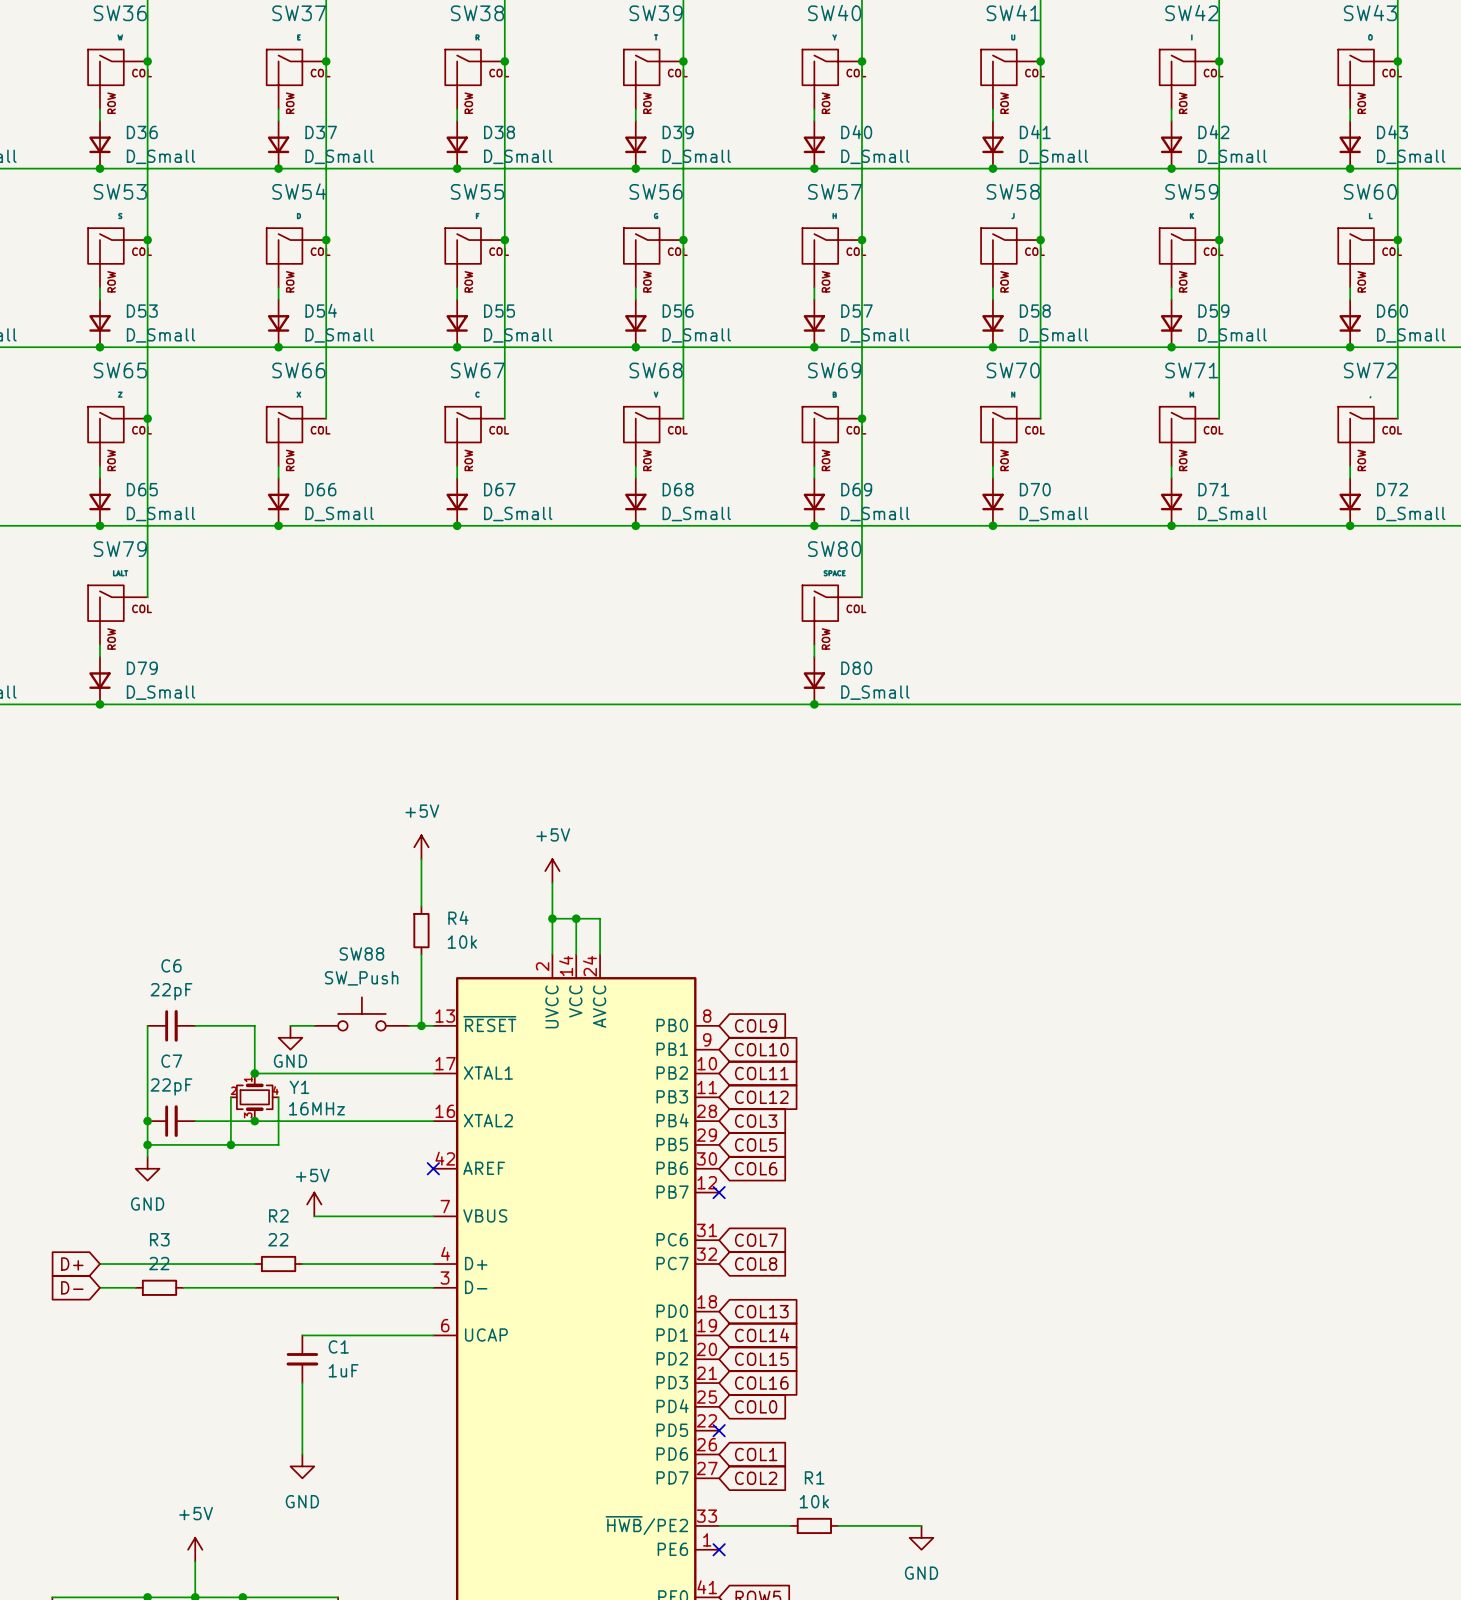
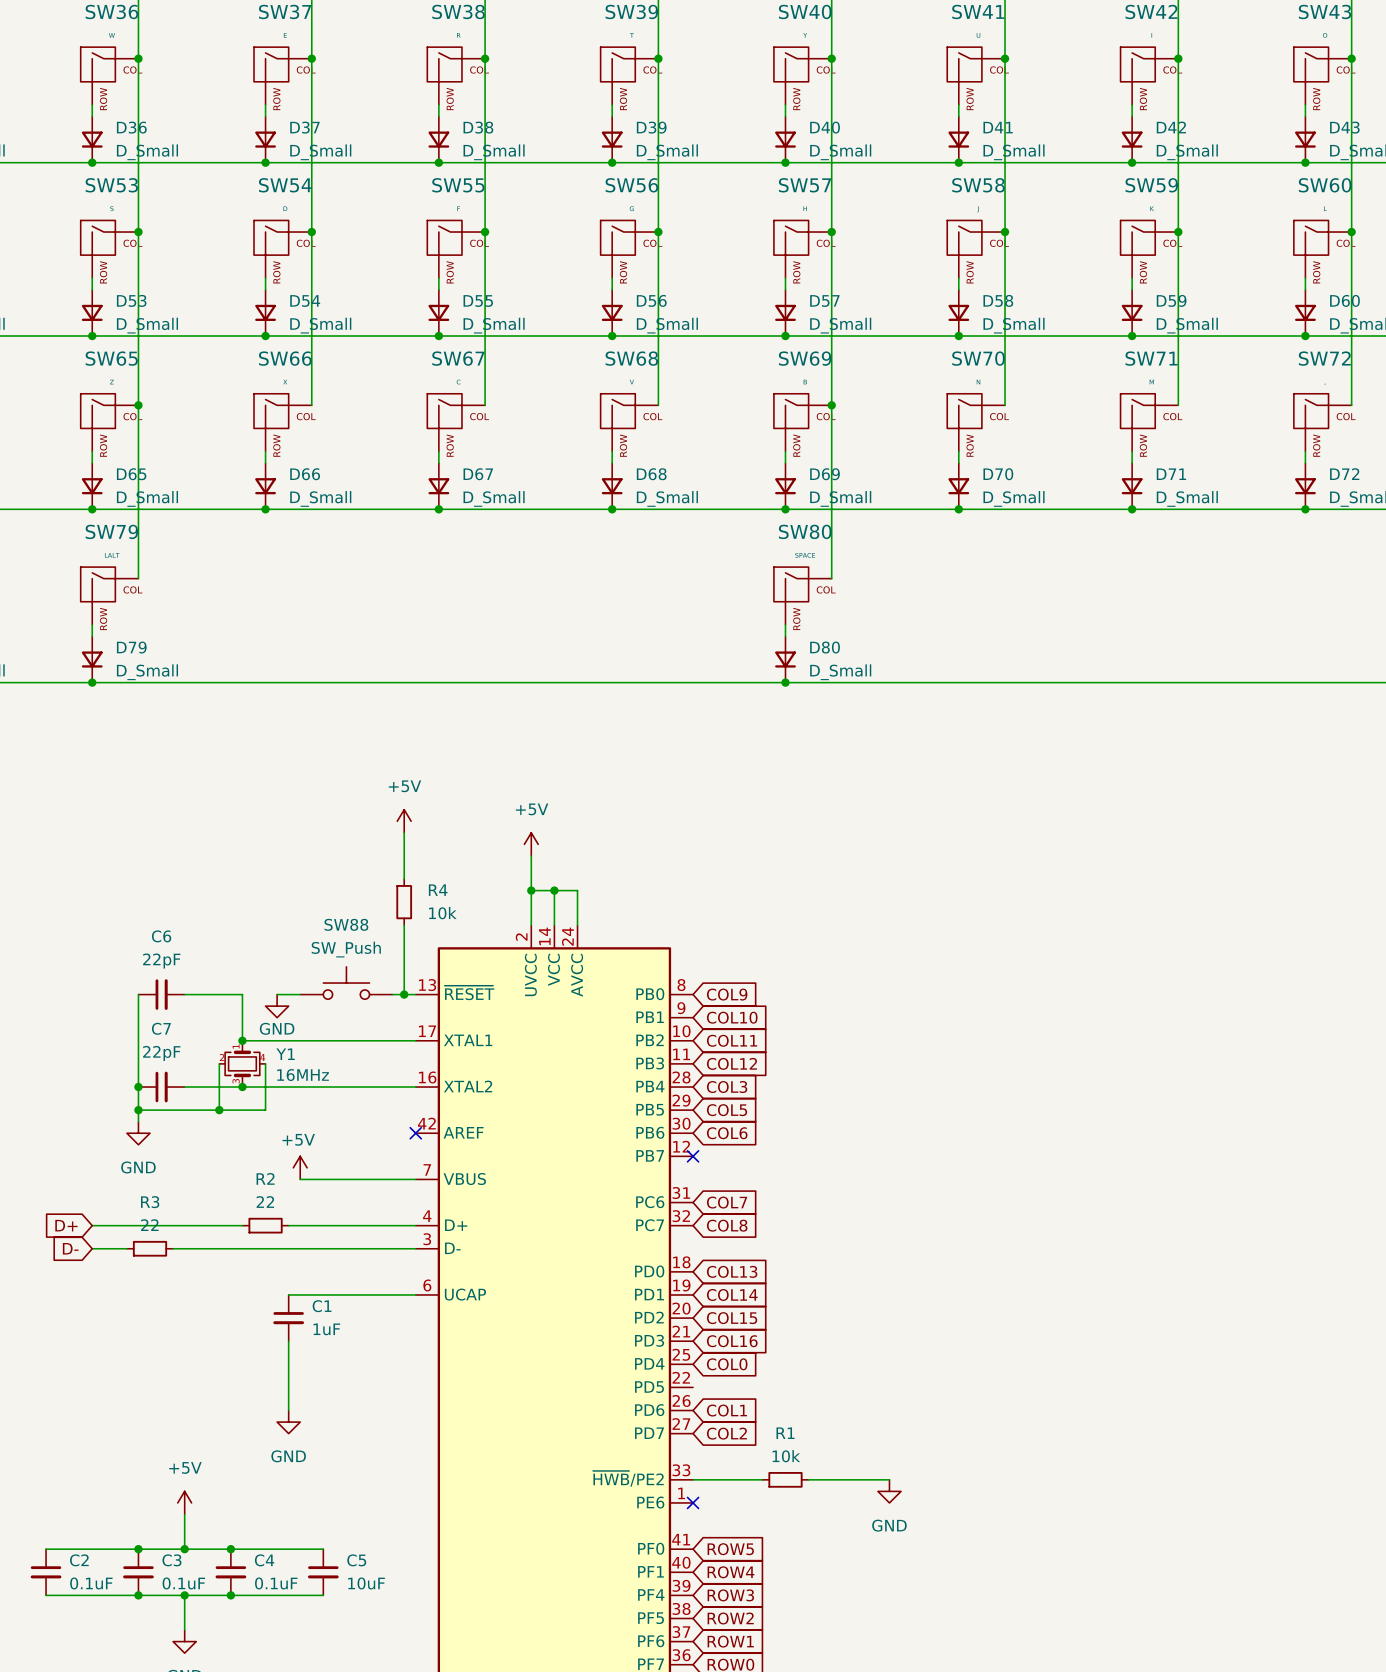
no-connect mark: (719, 1430) -> none

